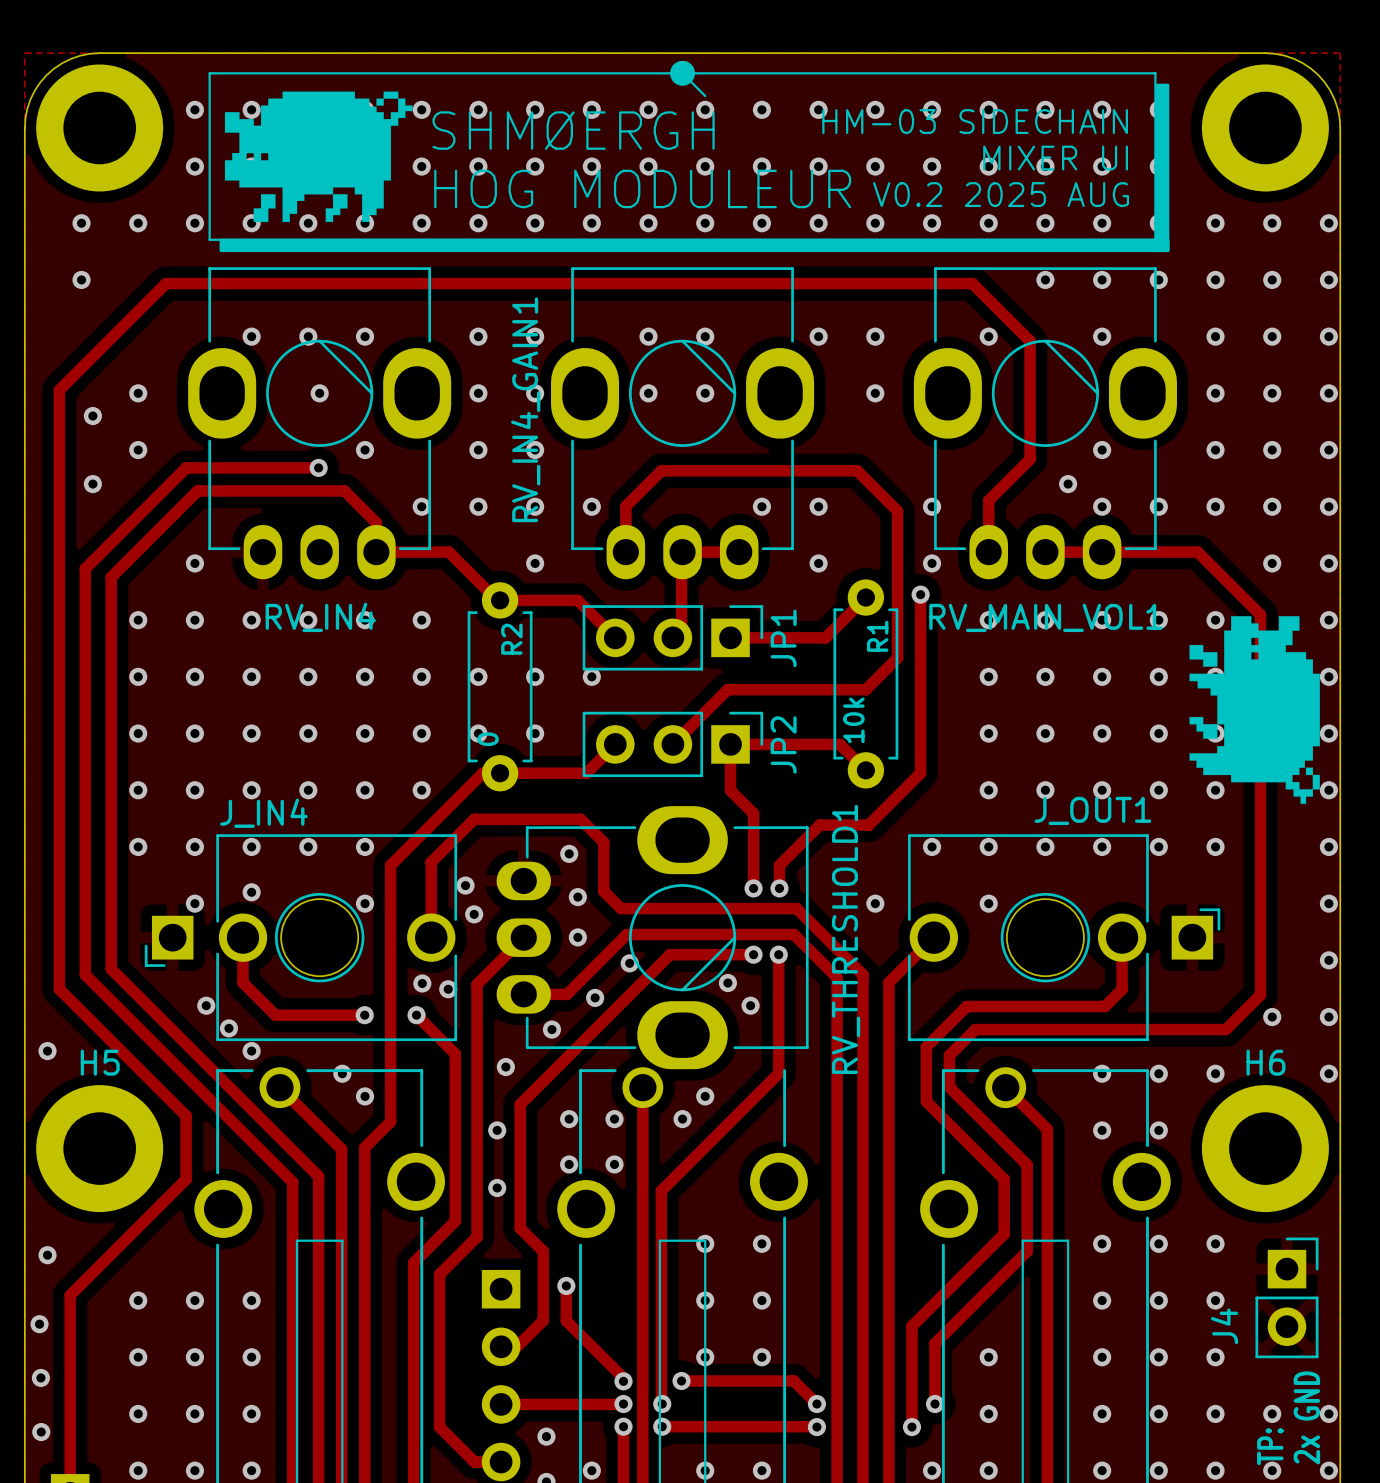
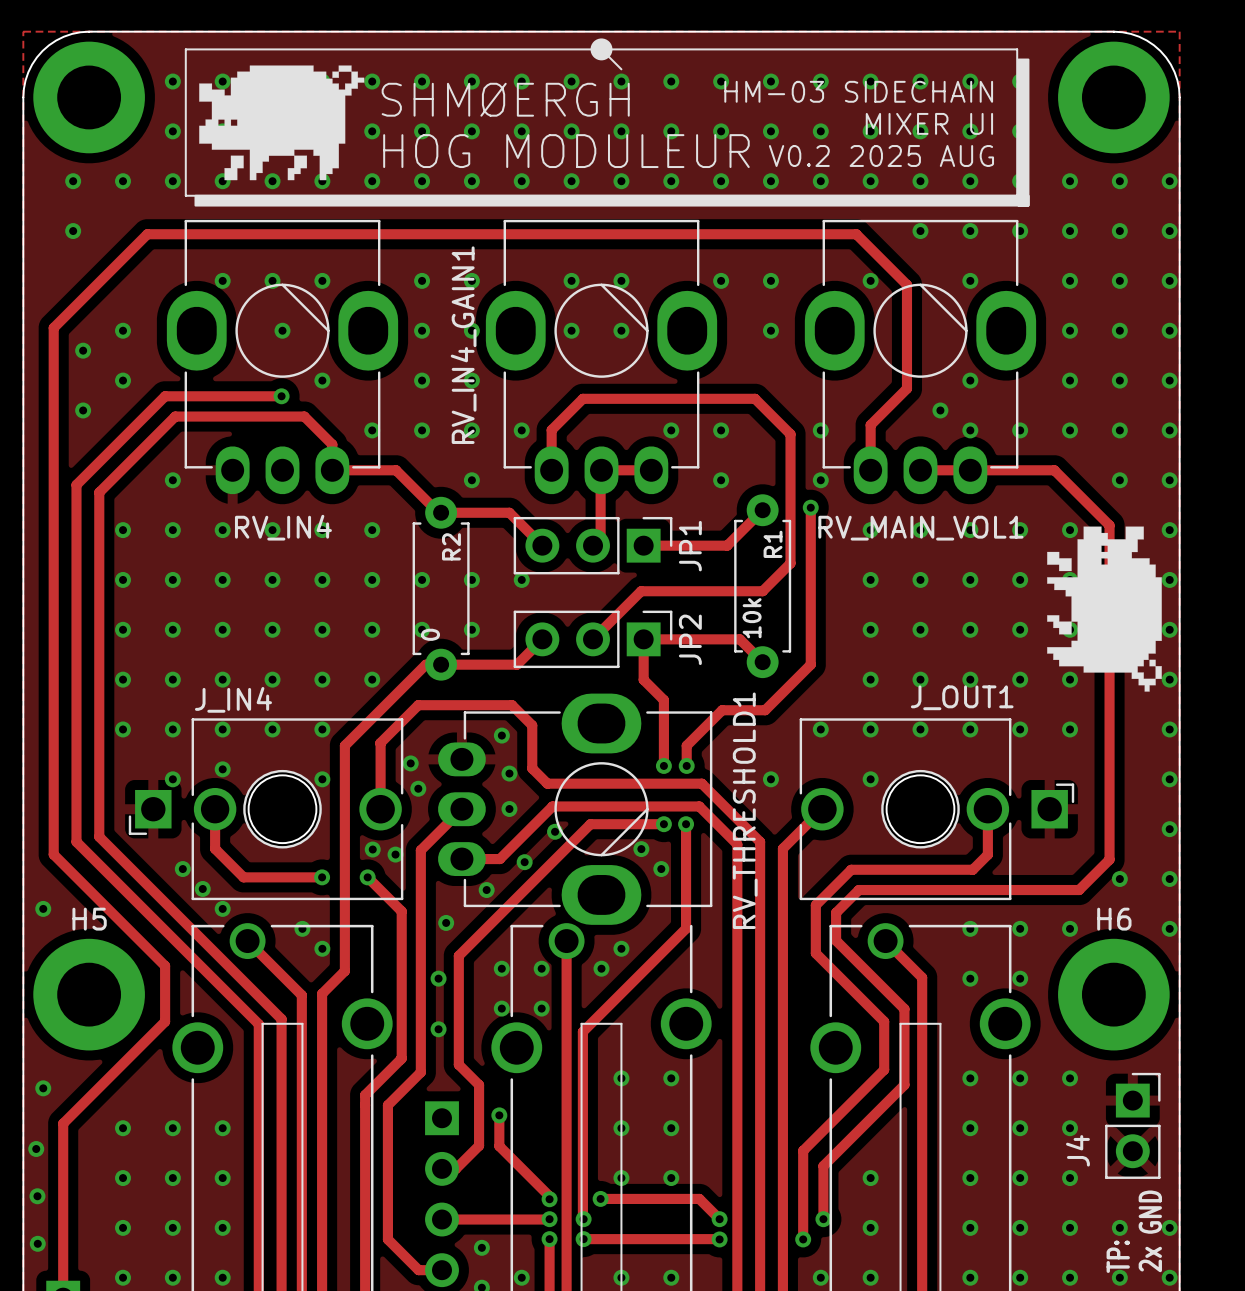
line: (296, 1240) (342, 1240) -> (262, 1075) (262, 1023) (302, 1023) (302, 1075)
line: (659, 1240) (705, 1240) -> (581, 1075) (581, 1023) (621, 1023) (621, 1075)
line: (1022, 1240) (1068, 1240) -> (900, 1075) (900, 1023) (940, 1023) (940, 1075)

